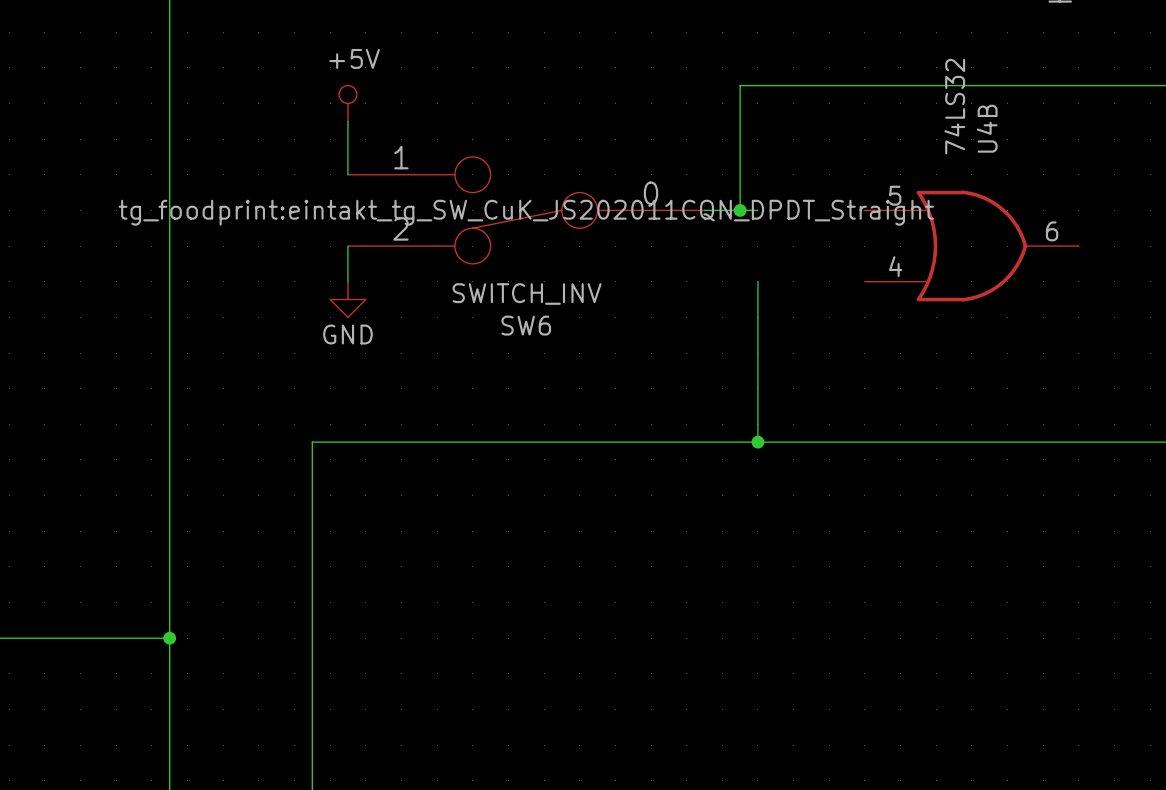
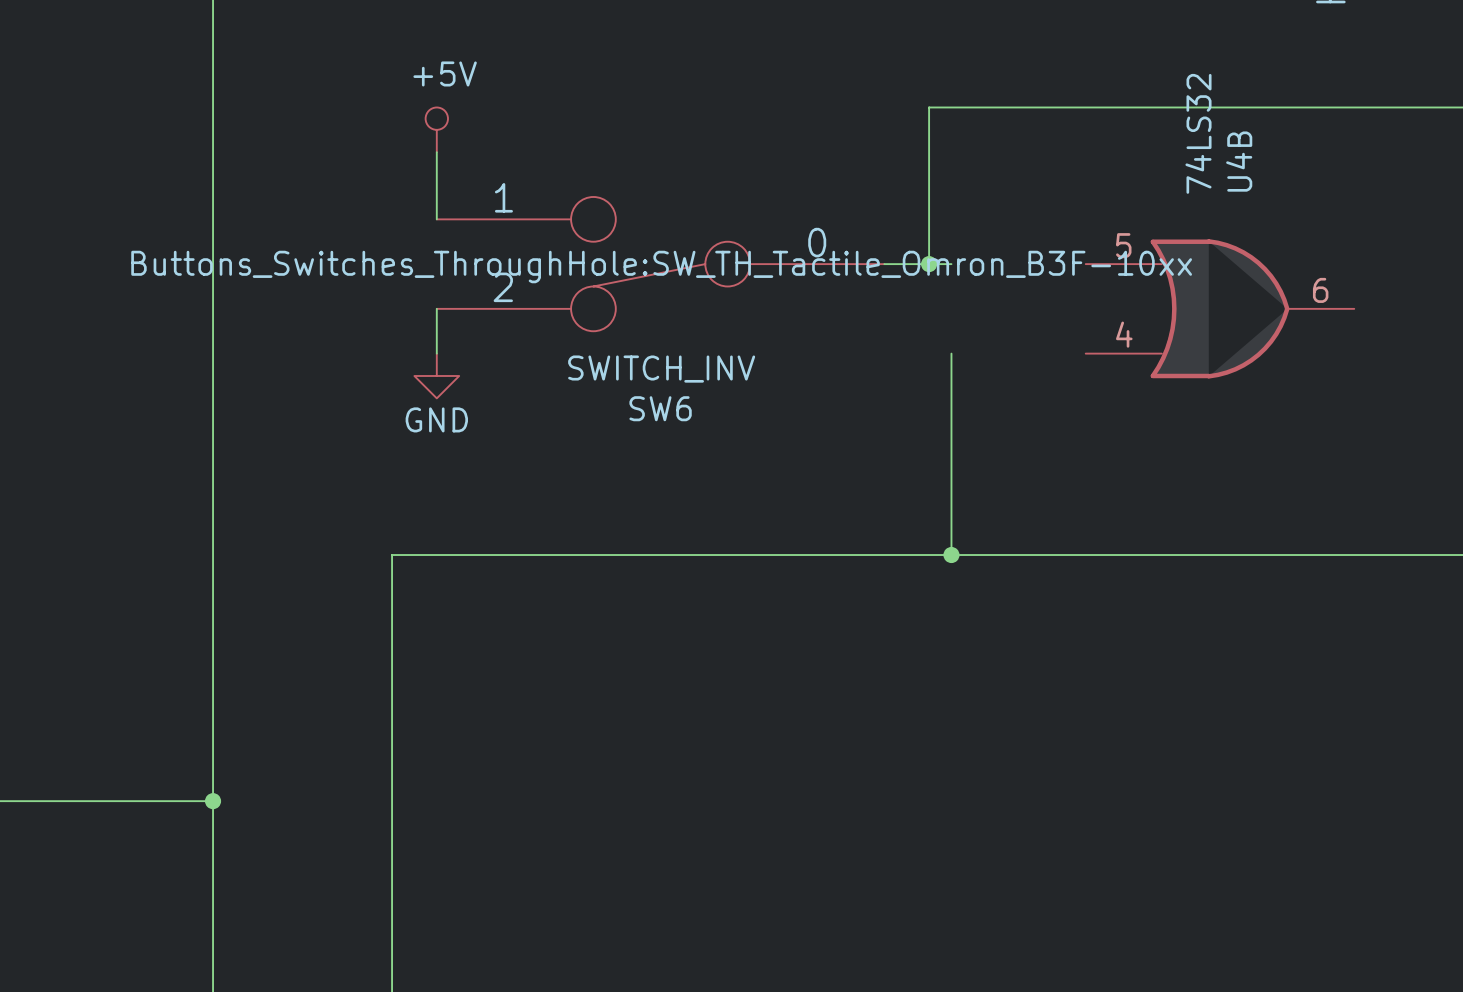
SW6 text: tg_foodprint:eintakt_tg_SW_CuK_JS202011CQN_DPDT_Straight (526, 212) -> Buttons_Switches_ThroughHole:SW_TH_Tactile_Omron_B3F-10xx (661, 267)

